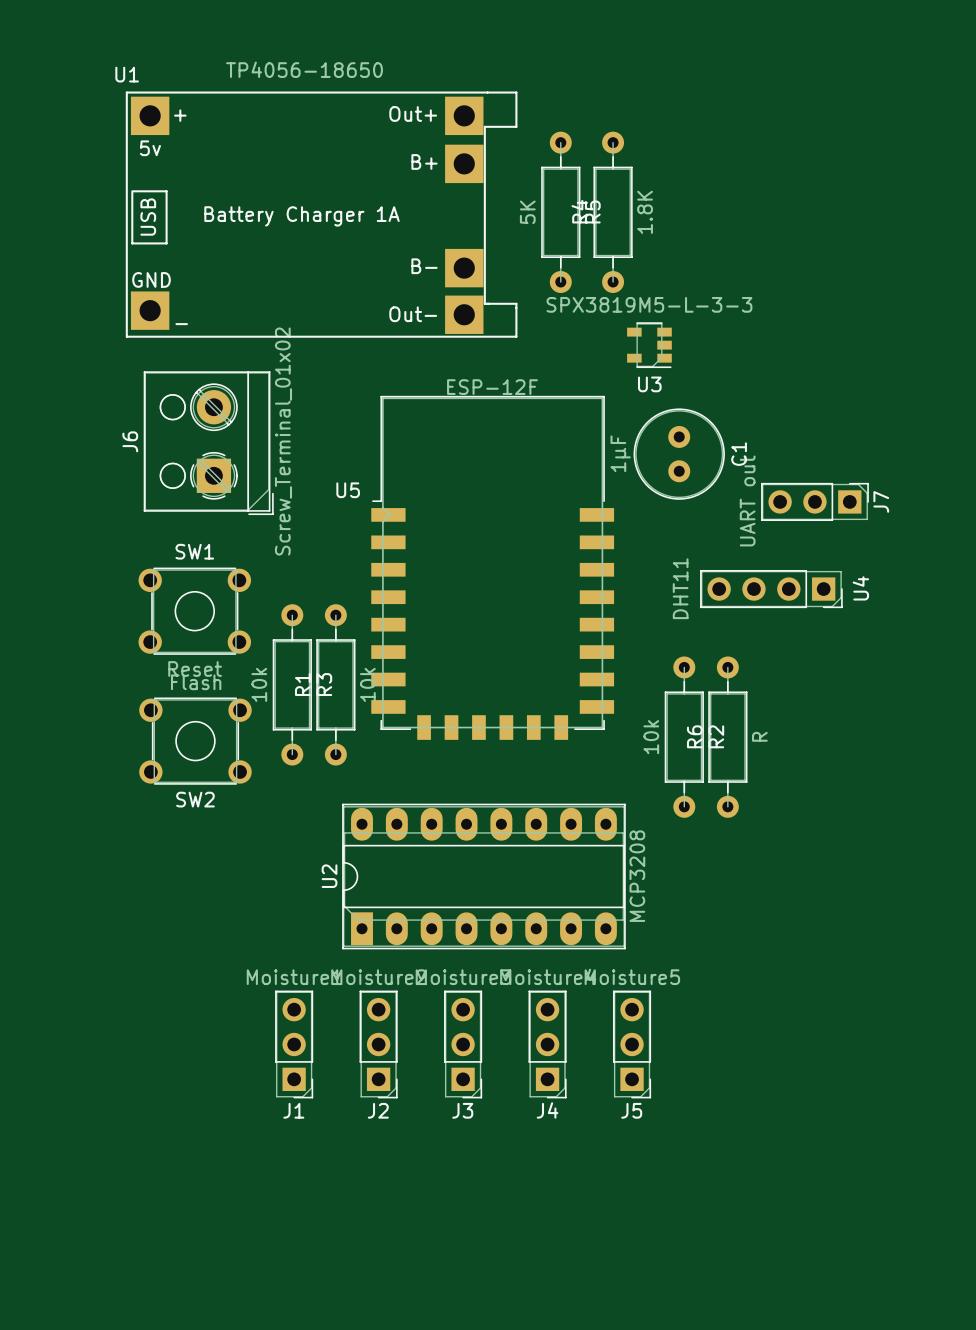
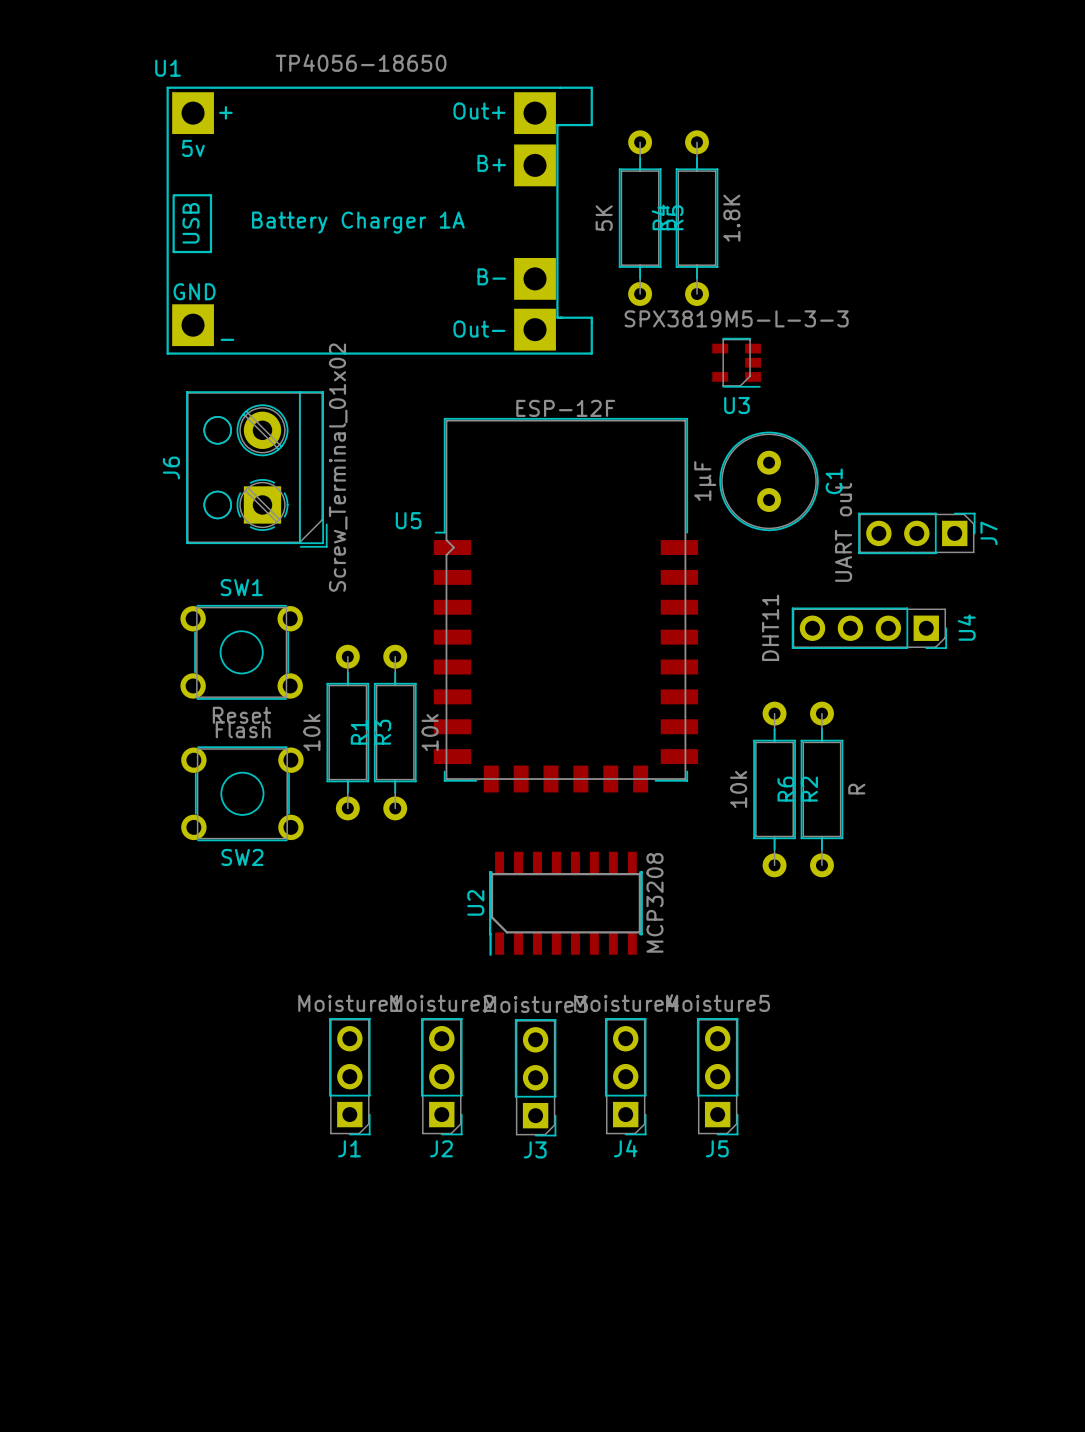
U2 footprint: [342, 803, 626, 950] -> [489, 851, 643, 956]
U2 name position: U2 (329, 876) -> U2 (475, 902)
U2 value position: MCP3208 (637, 876) -> MCP3208 (654, 902)
J1 position: (294, 1044) -> (349, 1076)
J2 position: (378, 1044) -> (441, 1076)
J3 position: (463, 1044) -> (535, 1077)
J4 position: (547, 1044) -> (625, 1076)
J5 position: (632, 1044) -> (717, 1076)

